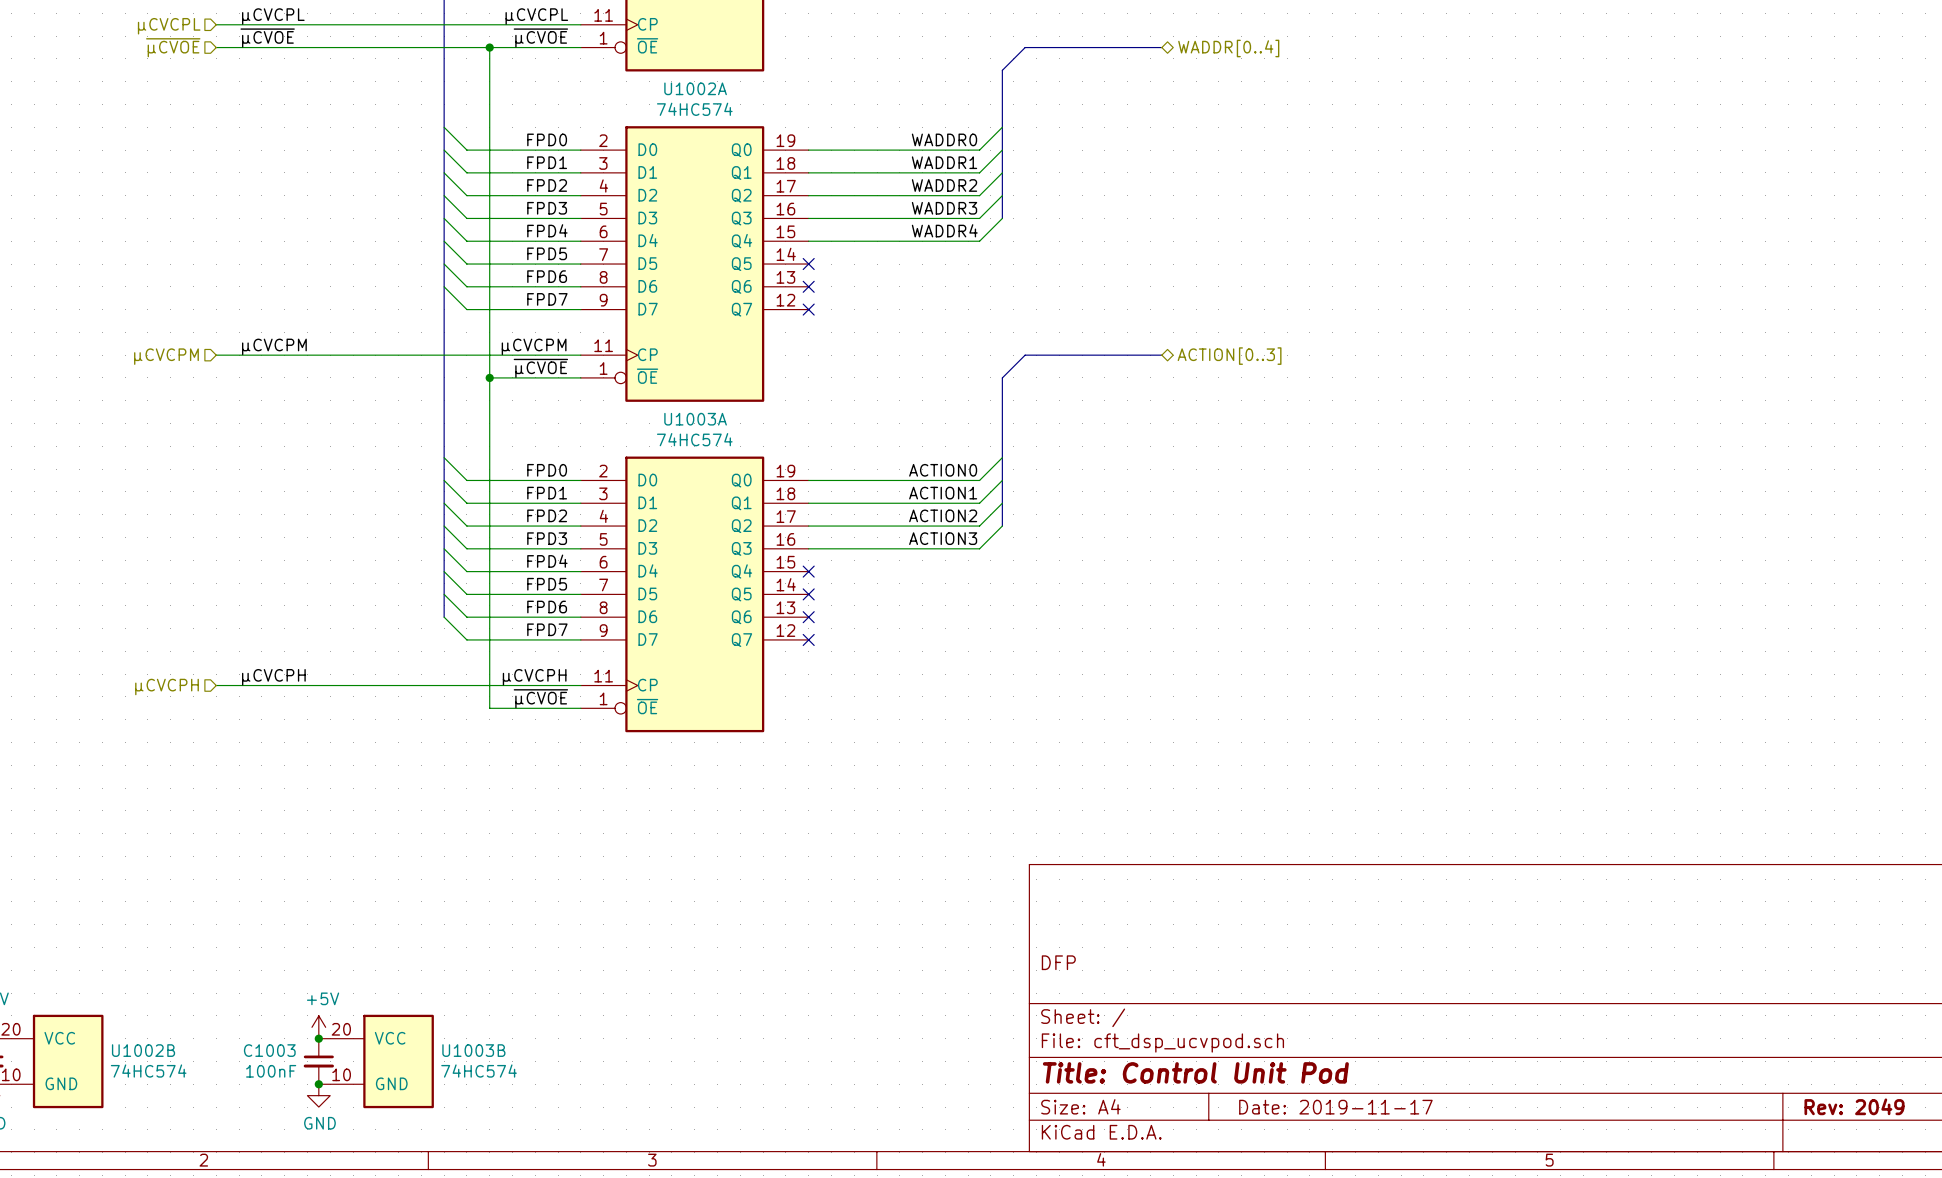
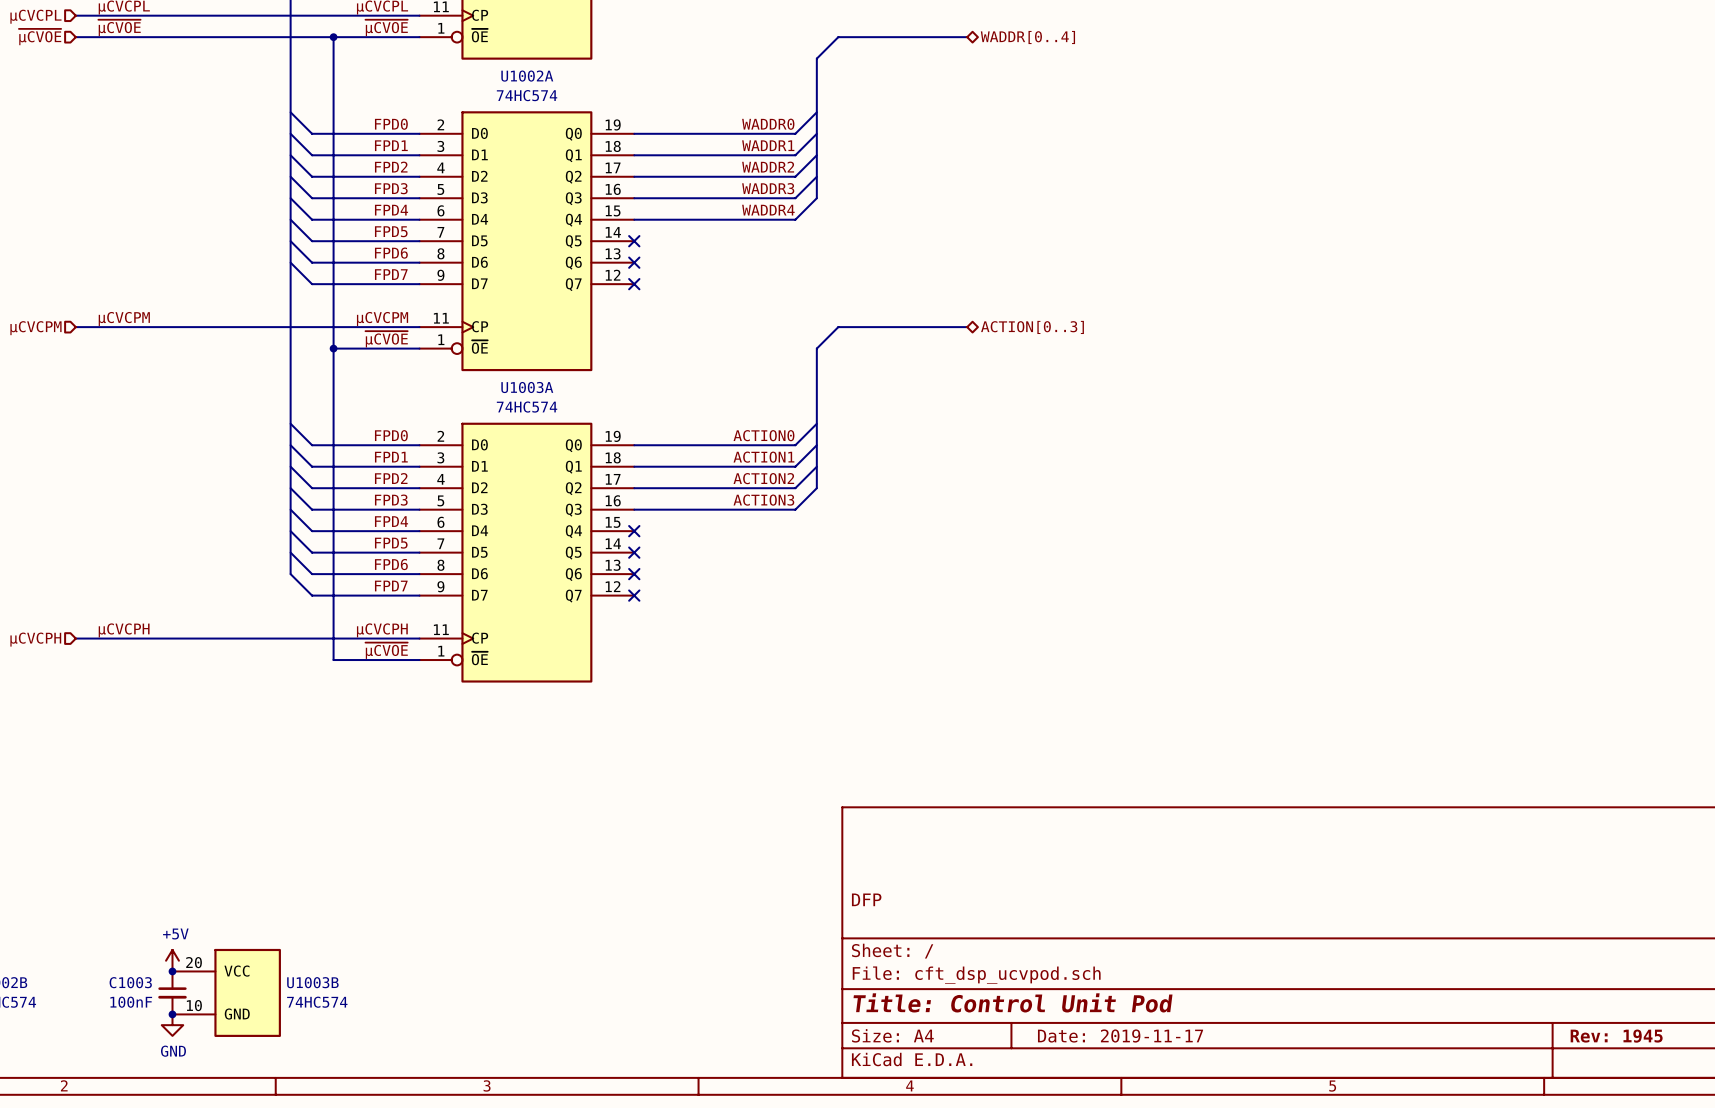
title block: Rev: 2049 (1854, 1106) -> Rev: 1945 (1616, 1036)

